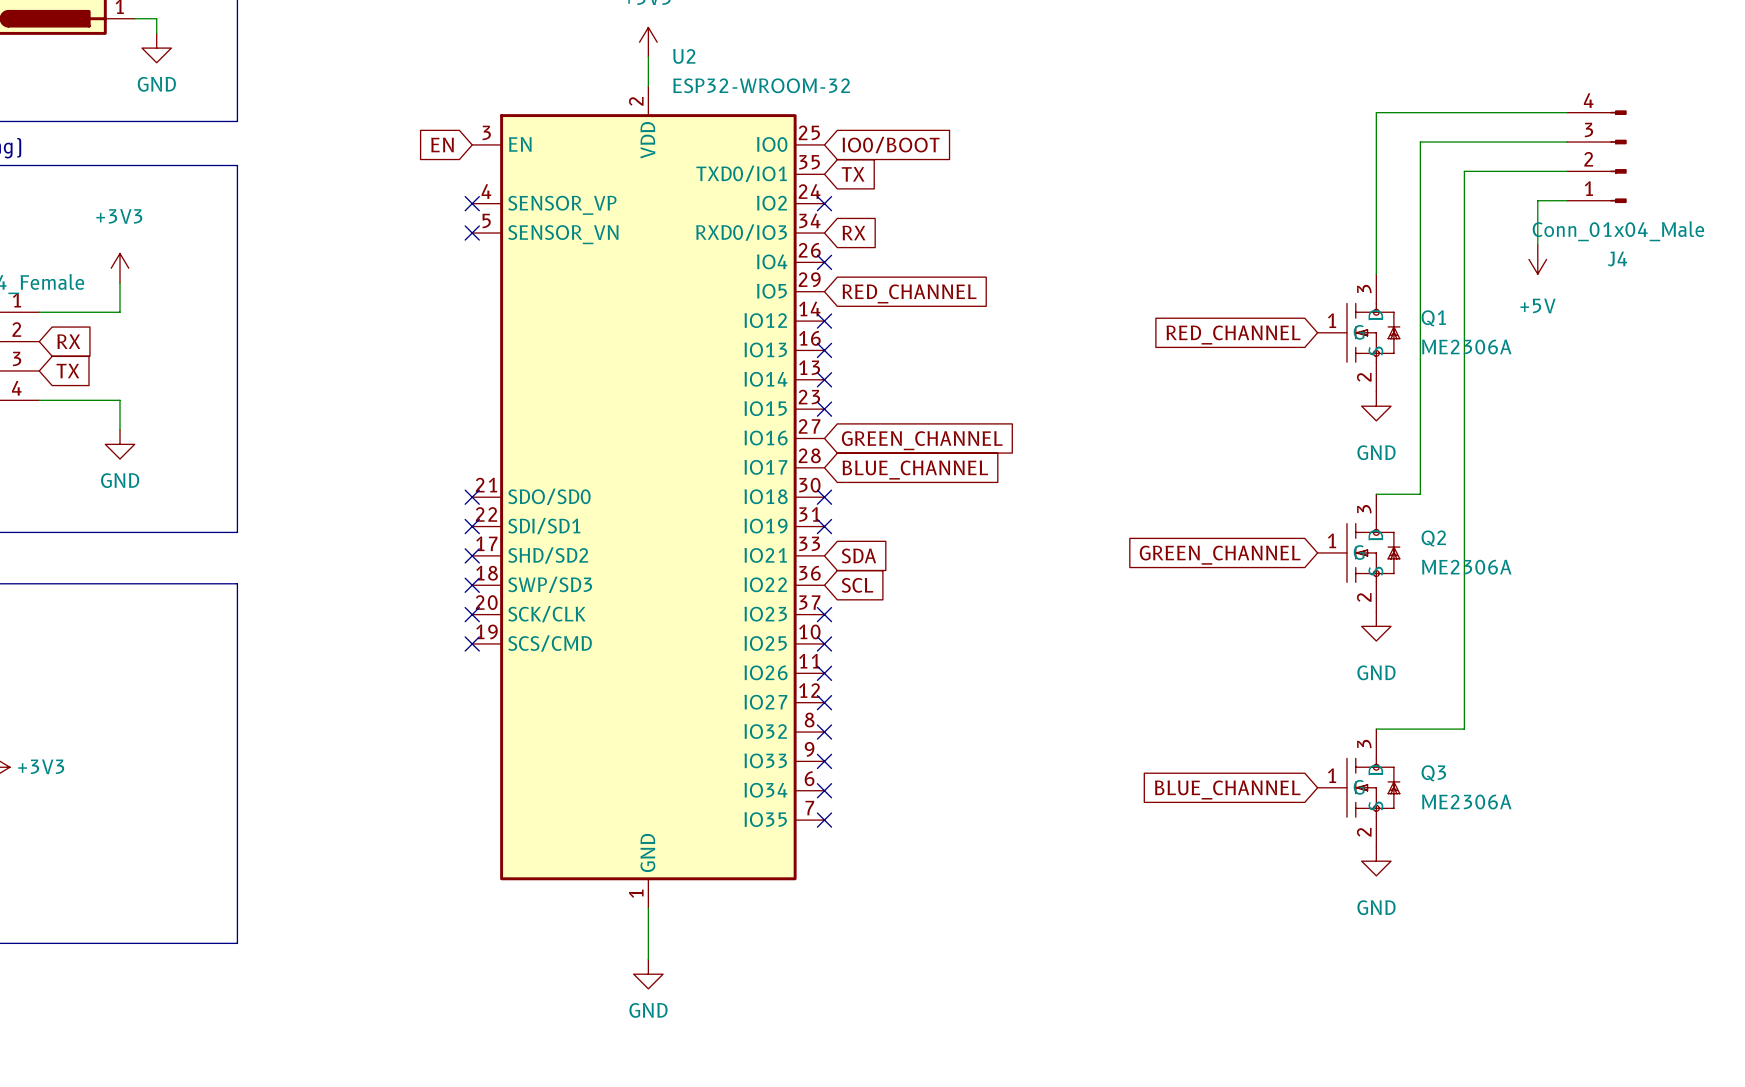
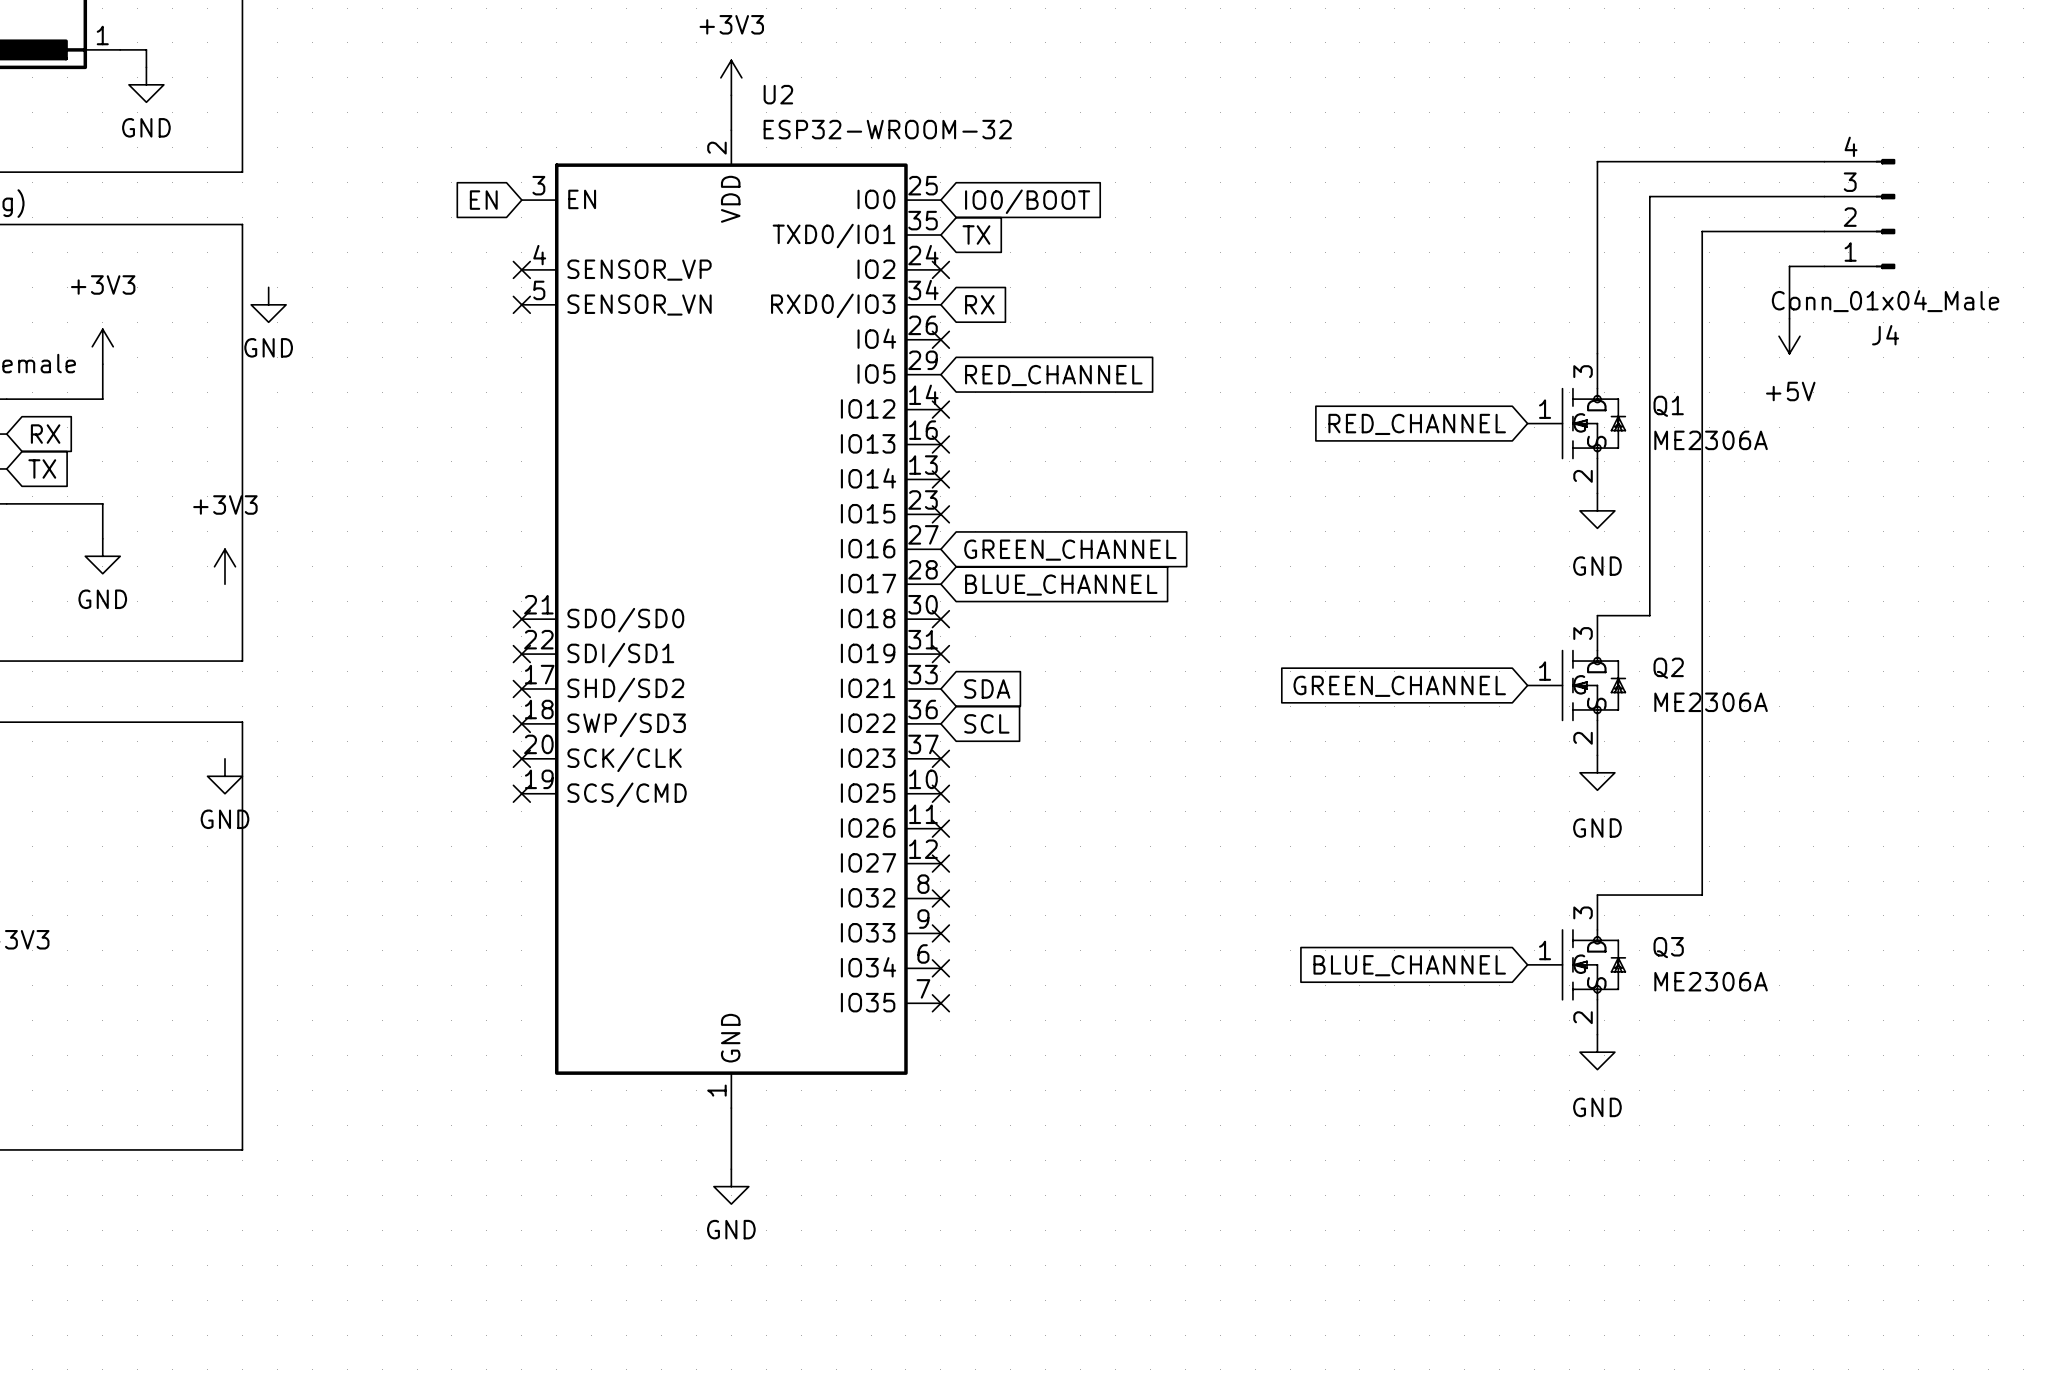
power symbol: none -> GND (268, 304)
power symbol: none -> +3V3 (224, 566)
power symbol: none -> GND (224, 776)

